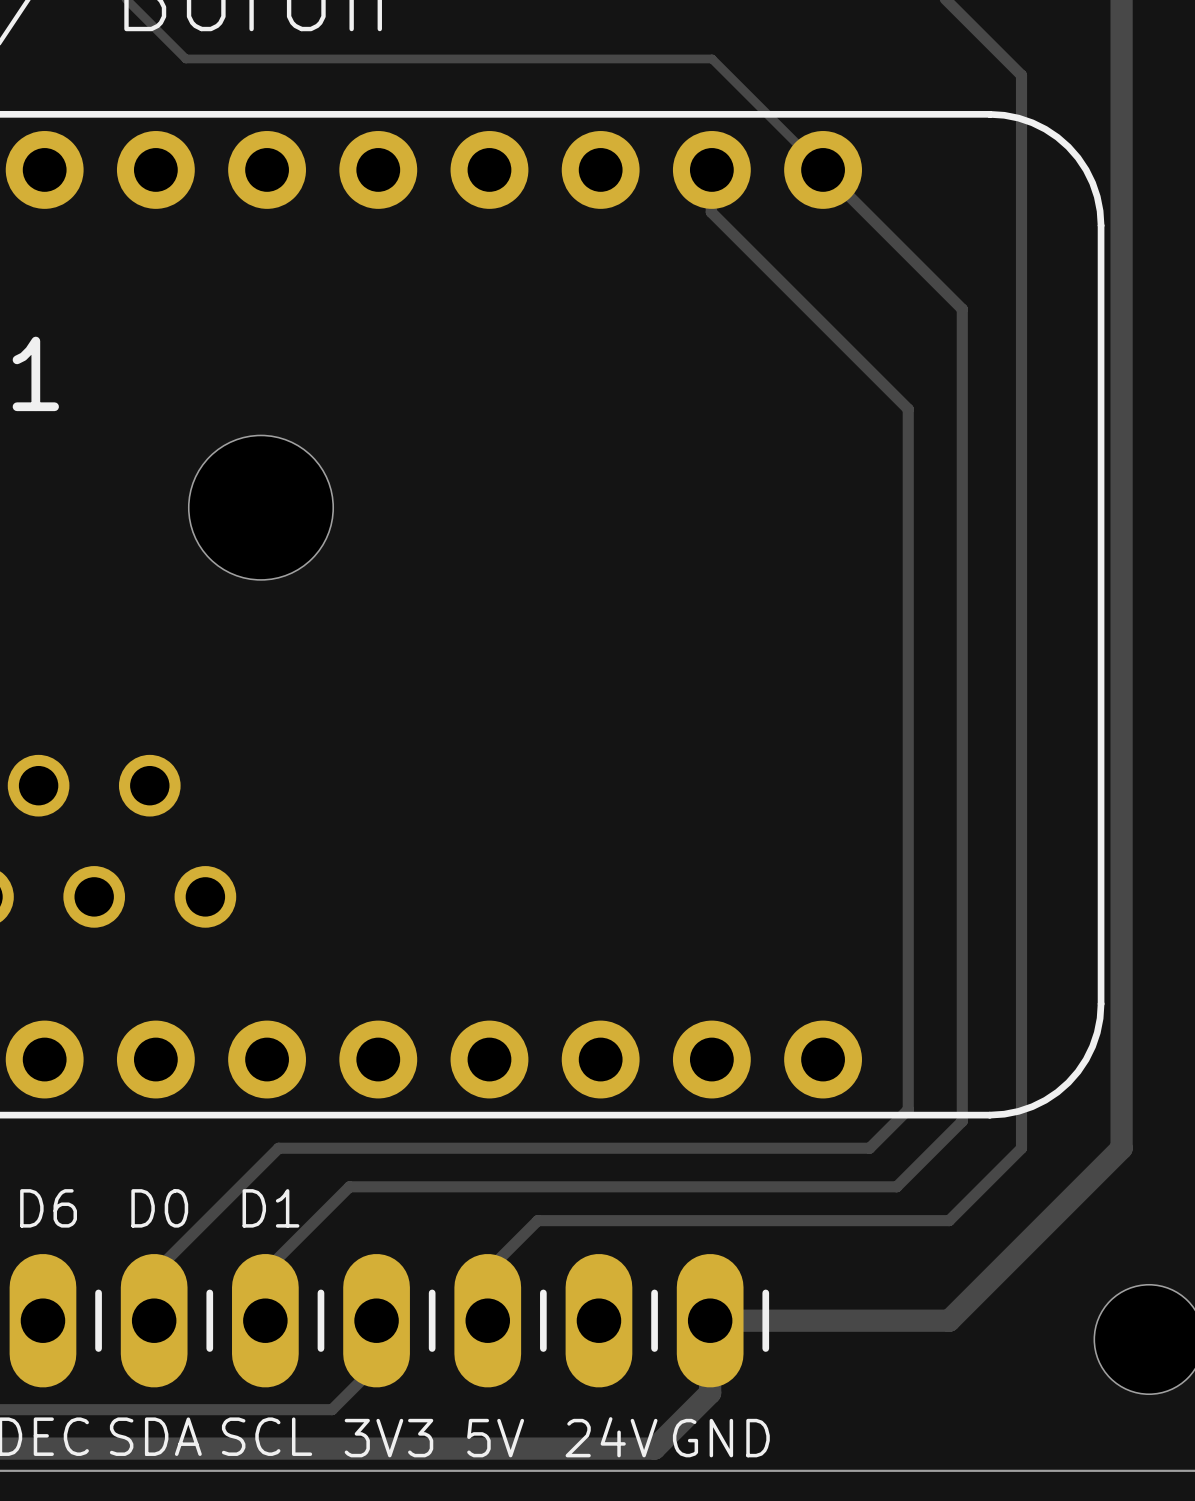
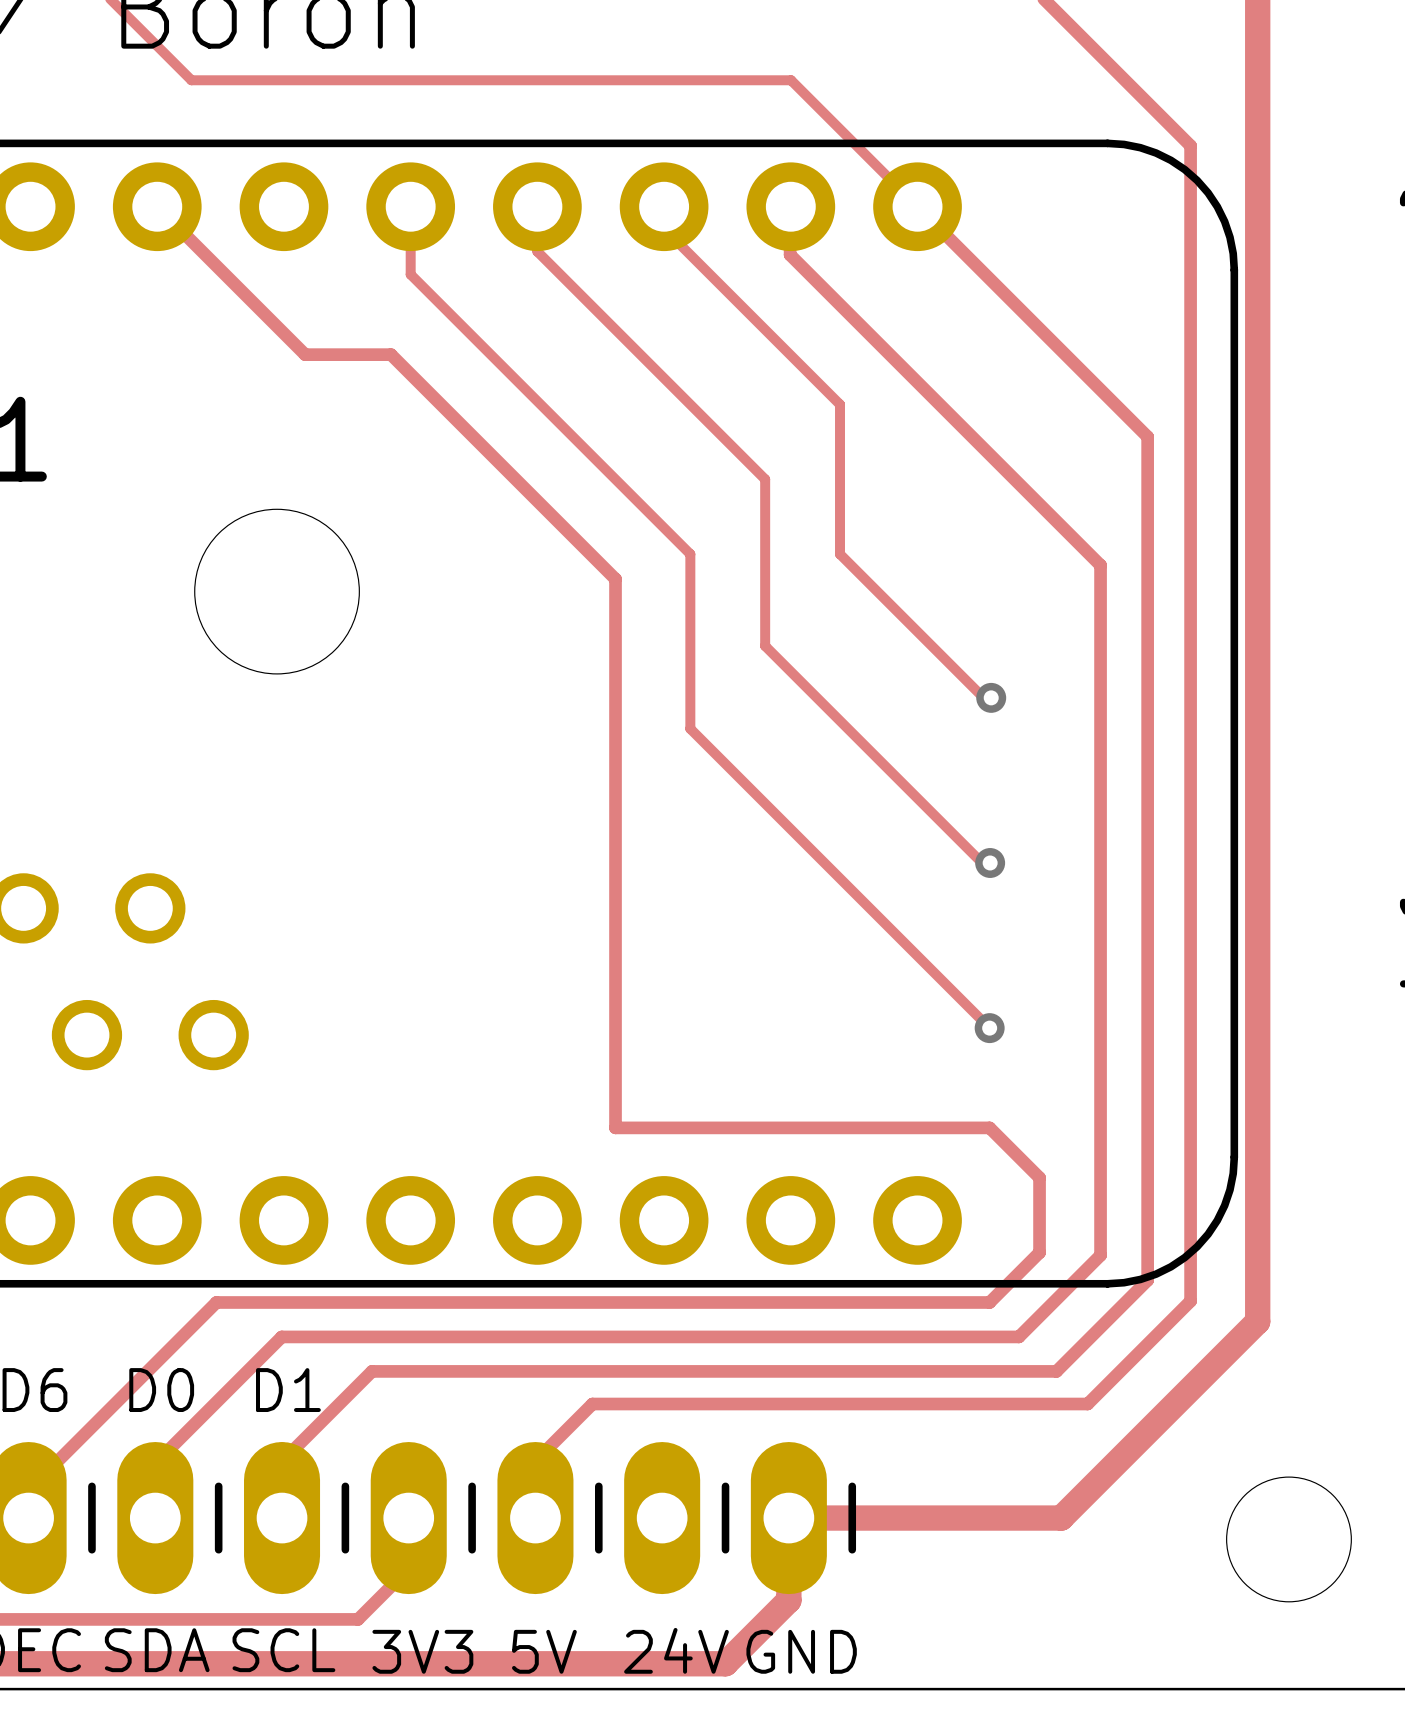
track: (1021, 75) (1021, 1148) (949, 1220) -> (1143, 98) (1190, 145) (1190, 1301) (1087, 1404) (1061, 1404)
track: none -> (157, 206) (305, 354) (391, 354) (615, 579) (615, 1127) (989, 1127) (1039, 1177) (1039, 1252) (1014, 1277)
track: none -> (410, 206) (410, 274) (690, 554) (690, 728) (989, 1028)
track: none -> (537, 206) (537, 251) (765, 479) (765, 645) (984, 865) (990, 865)
track: none -> (664, 206) (664, 228) (840, 404) (840, 554) (983, 697) (991, 697)
track: (962, 309) (962, 1121) (896, 1186) (349, 1186) (344, 1192) -> (1076, 365) (1147, 436) (1147, 1280) (1056, 1371) (371, 1371)
track: (908, 409) (908, 1109) -> (1014, 479) (1100, 565) (1100, 1255) (1018, 1336) (281, 1336)
via: none -> (991, 697)
via: none -> (990, 862)
via: none -> (989, 1028)
track: (886, 1131) (869, 1148) (278, 1148) (265, 1161) -> (989, 1302) (216, 1302) (28, 1490) (28, 1518)

